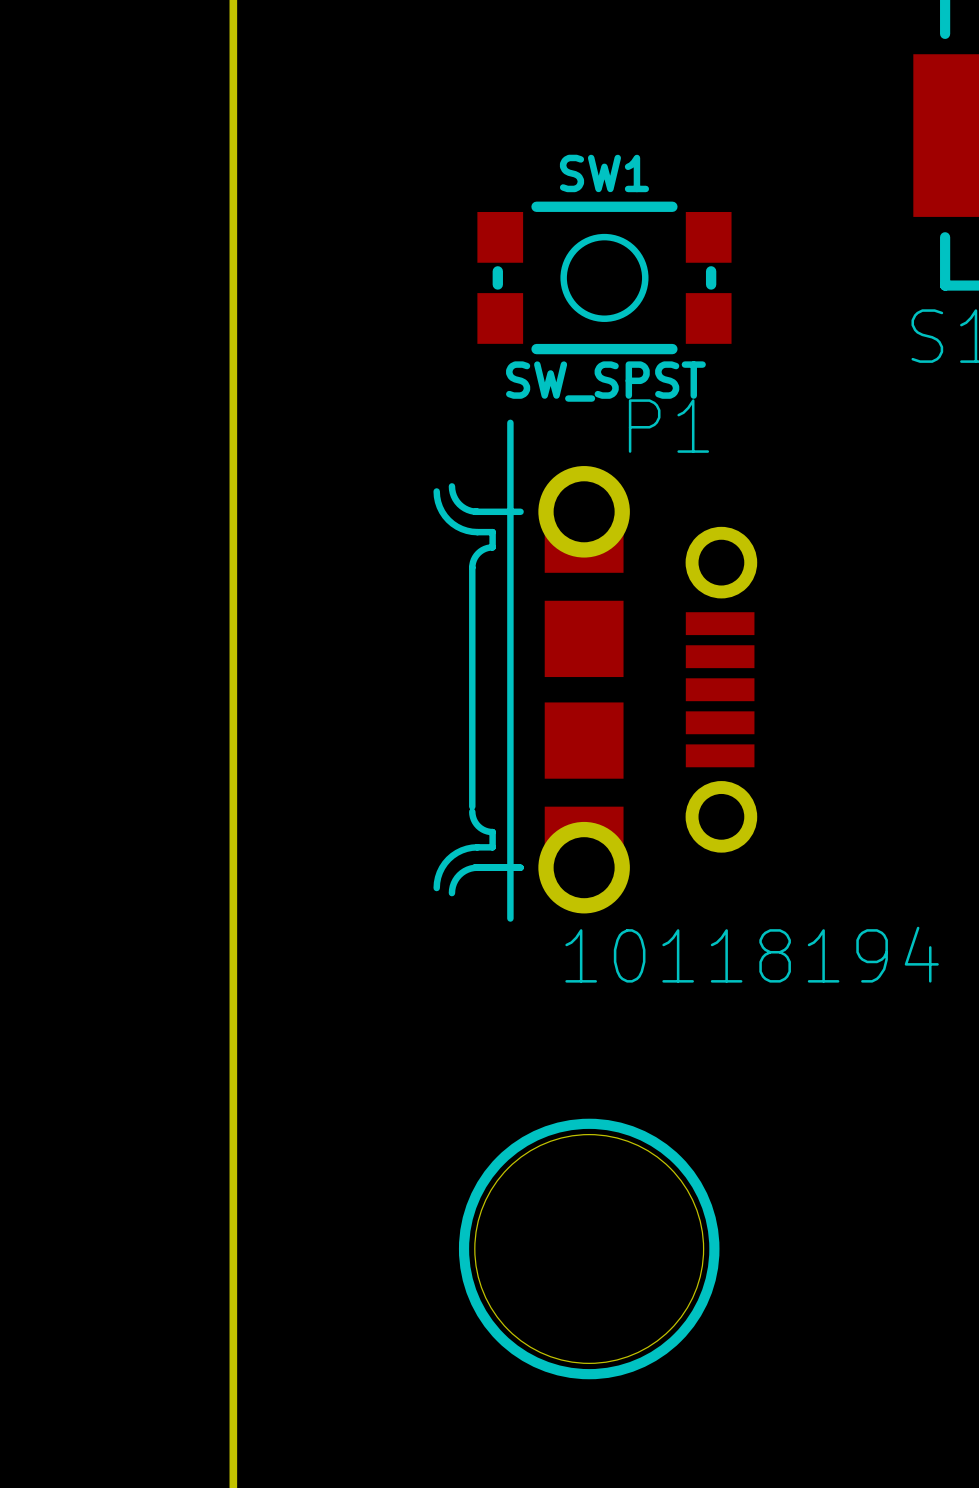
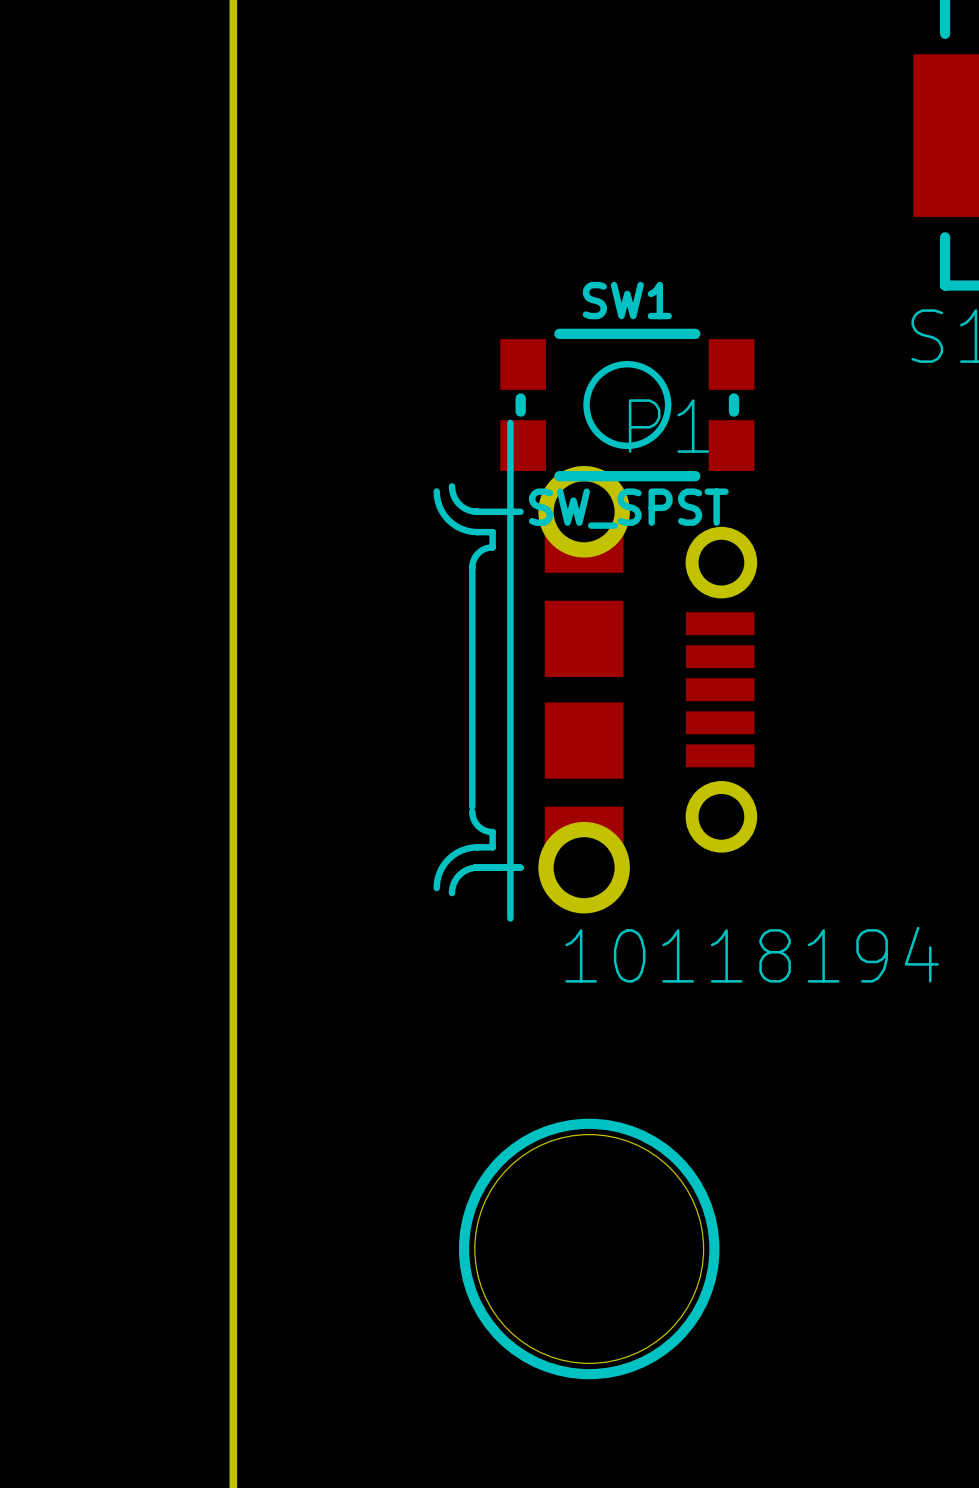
SW1 position: (604, 277) -> (627, 405)

